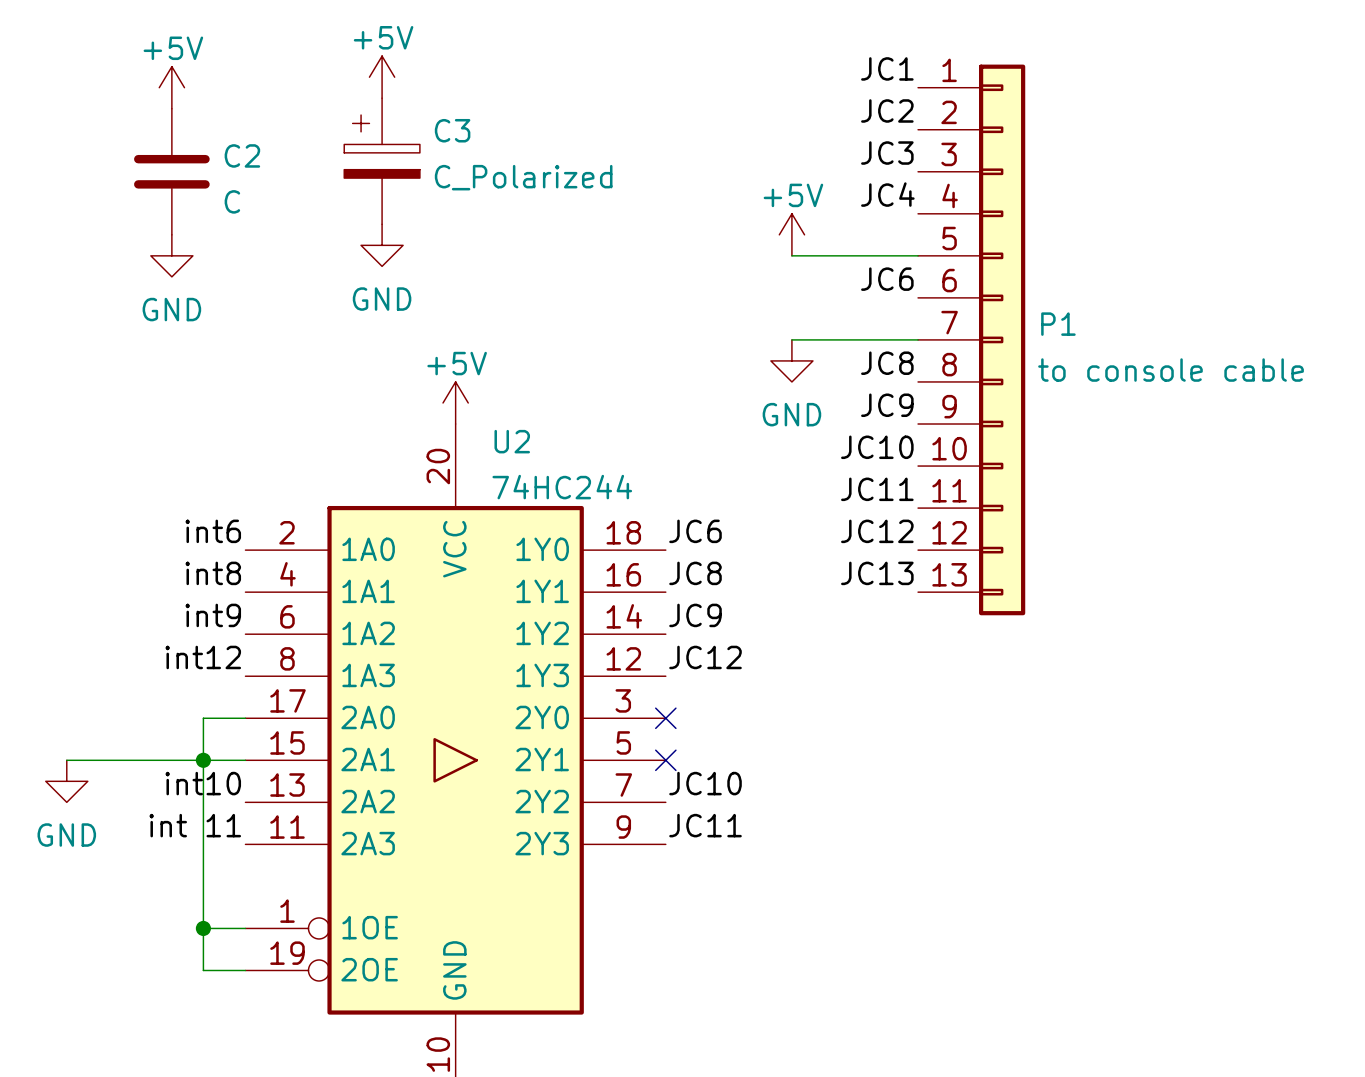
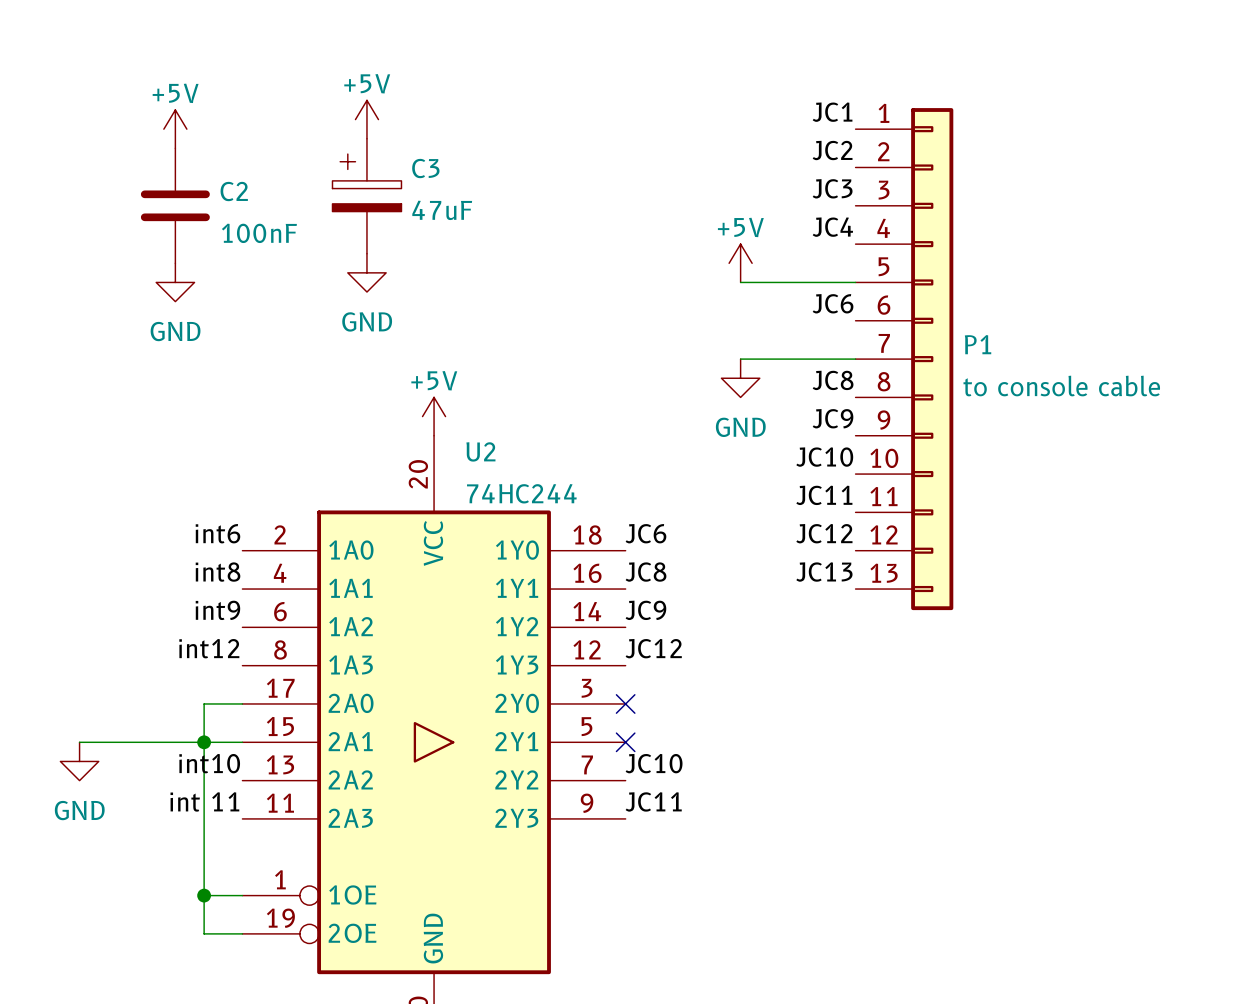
C3 value: C_Polarized (523, 177) -> 47uF (442, 210)
C2 value: C (232, 201) -> 100nF (259, 233)

